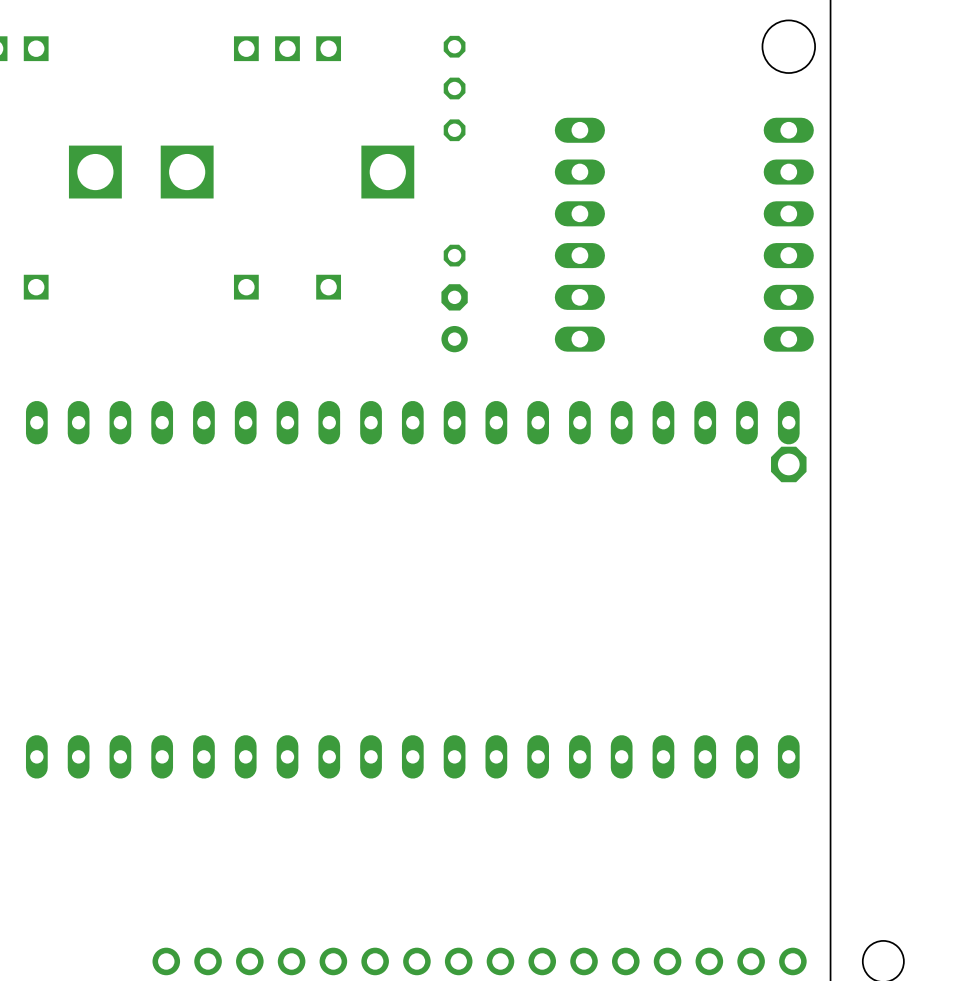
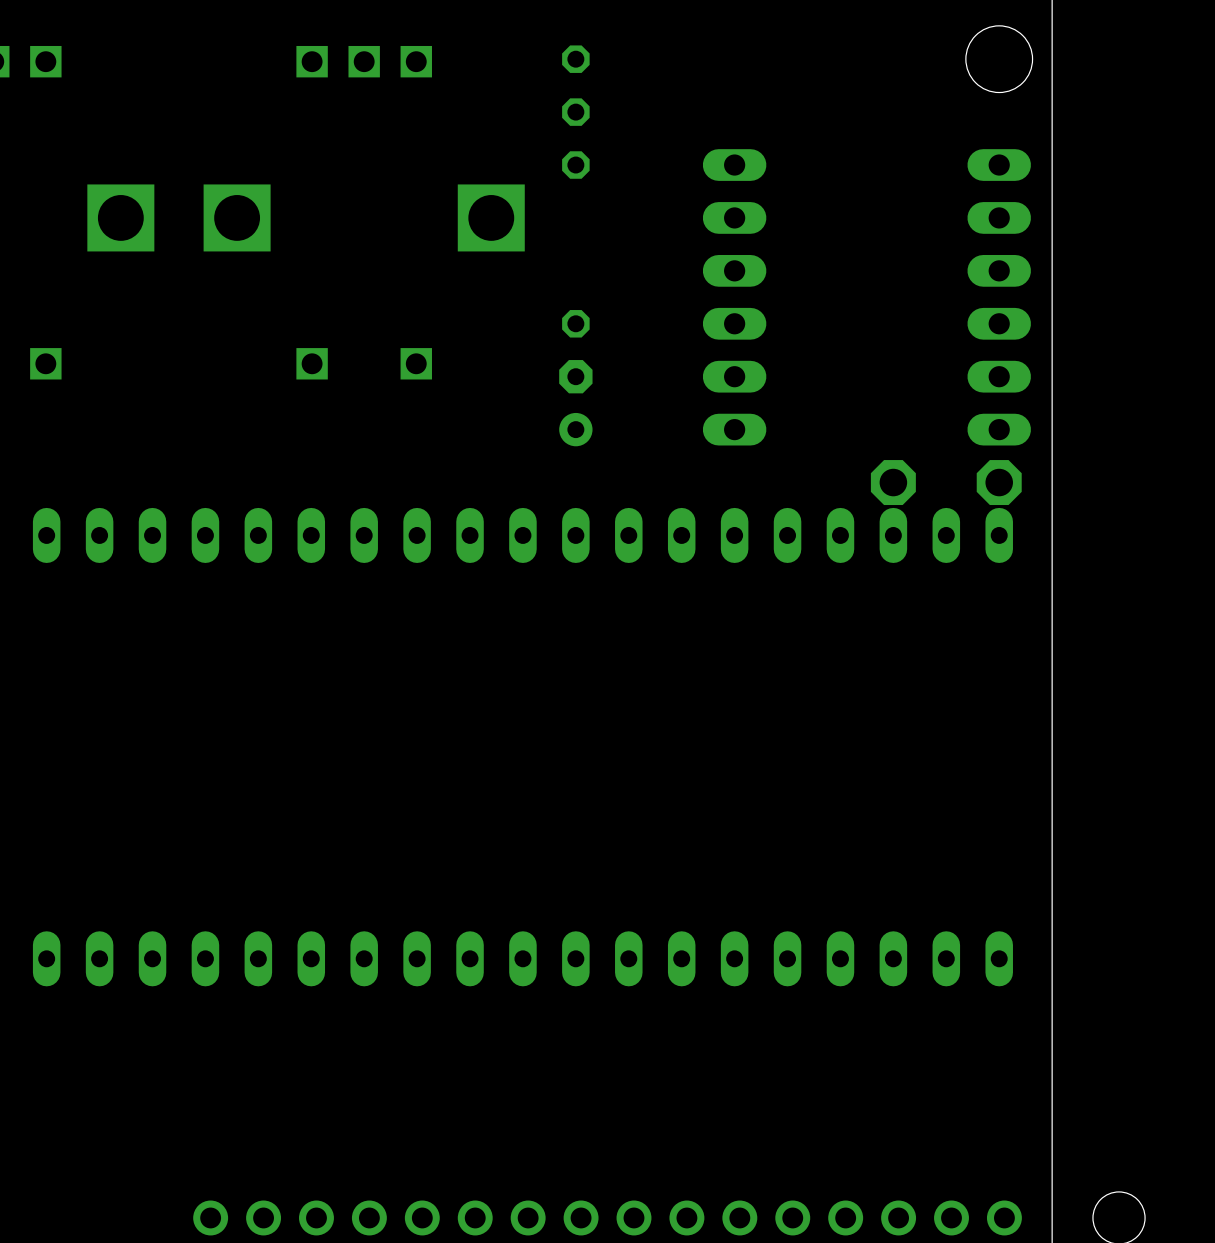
part: none -> (893, 482)
part: none -> (999, 482)
part: (788, 464) -> none

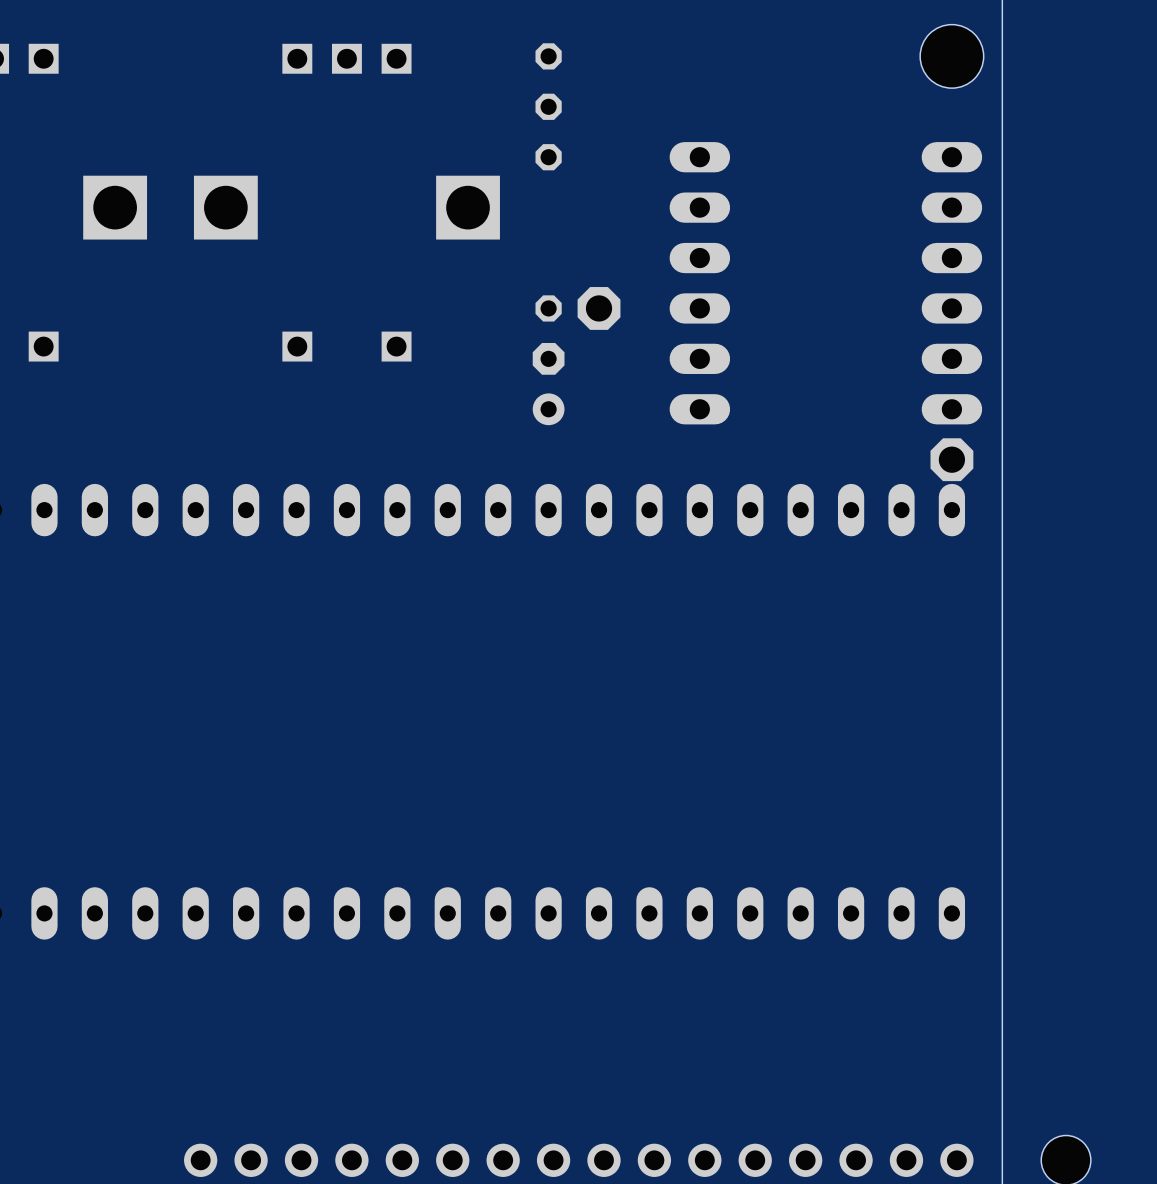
part position: (893, 482) -> (599, 308)

